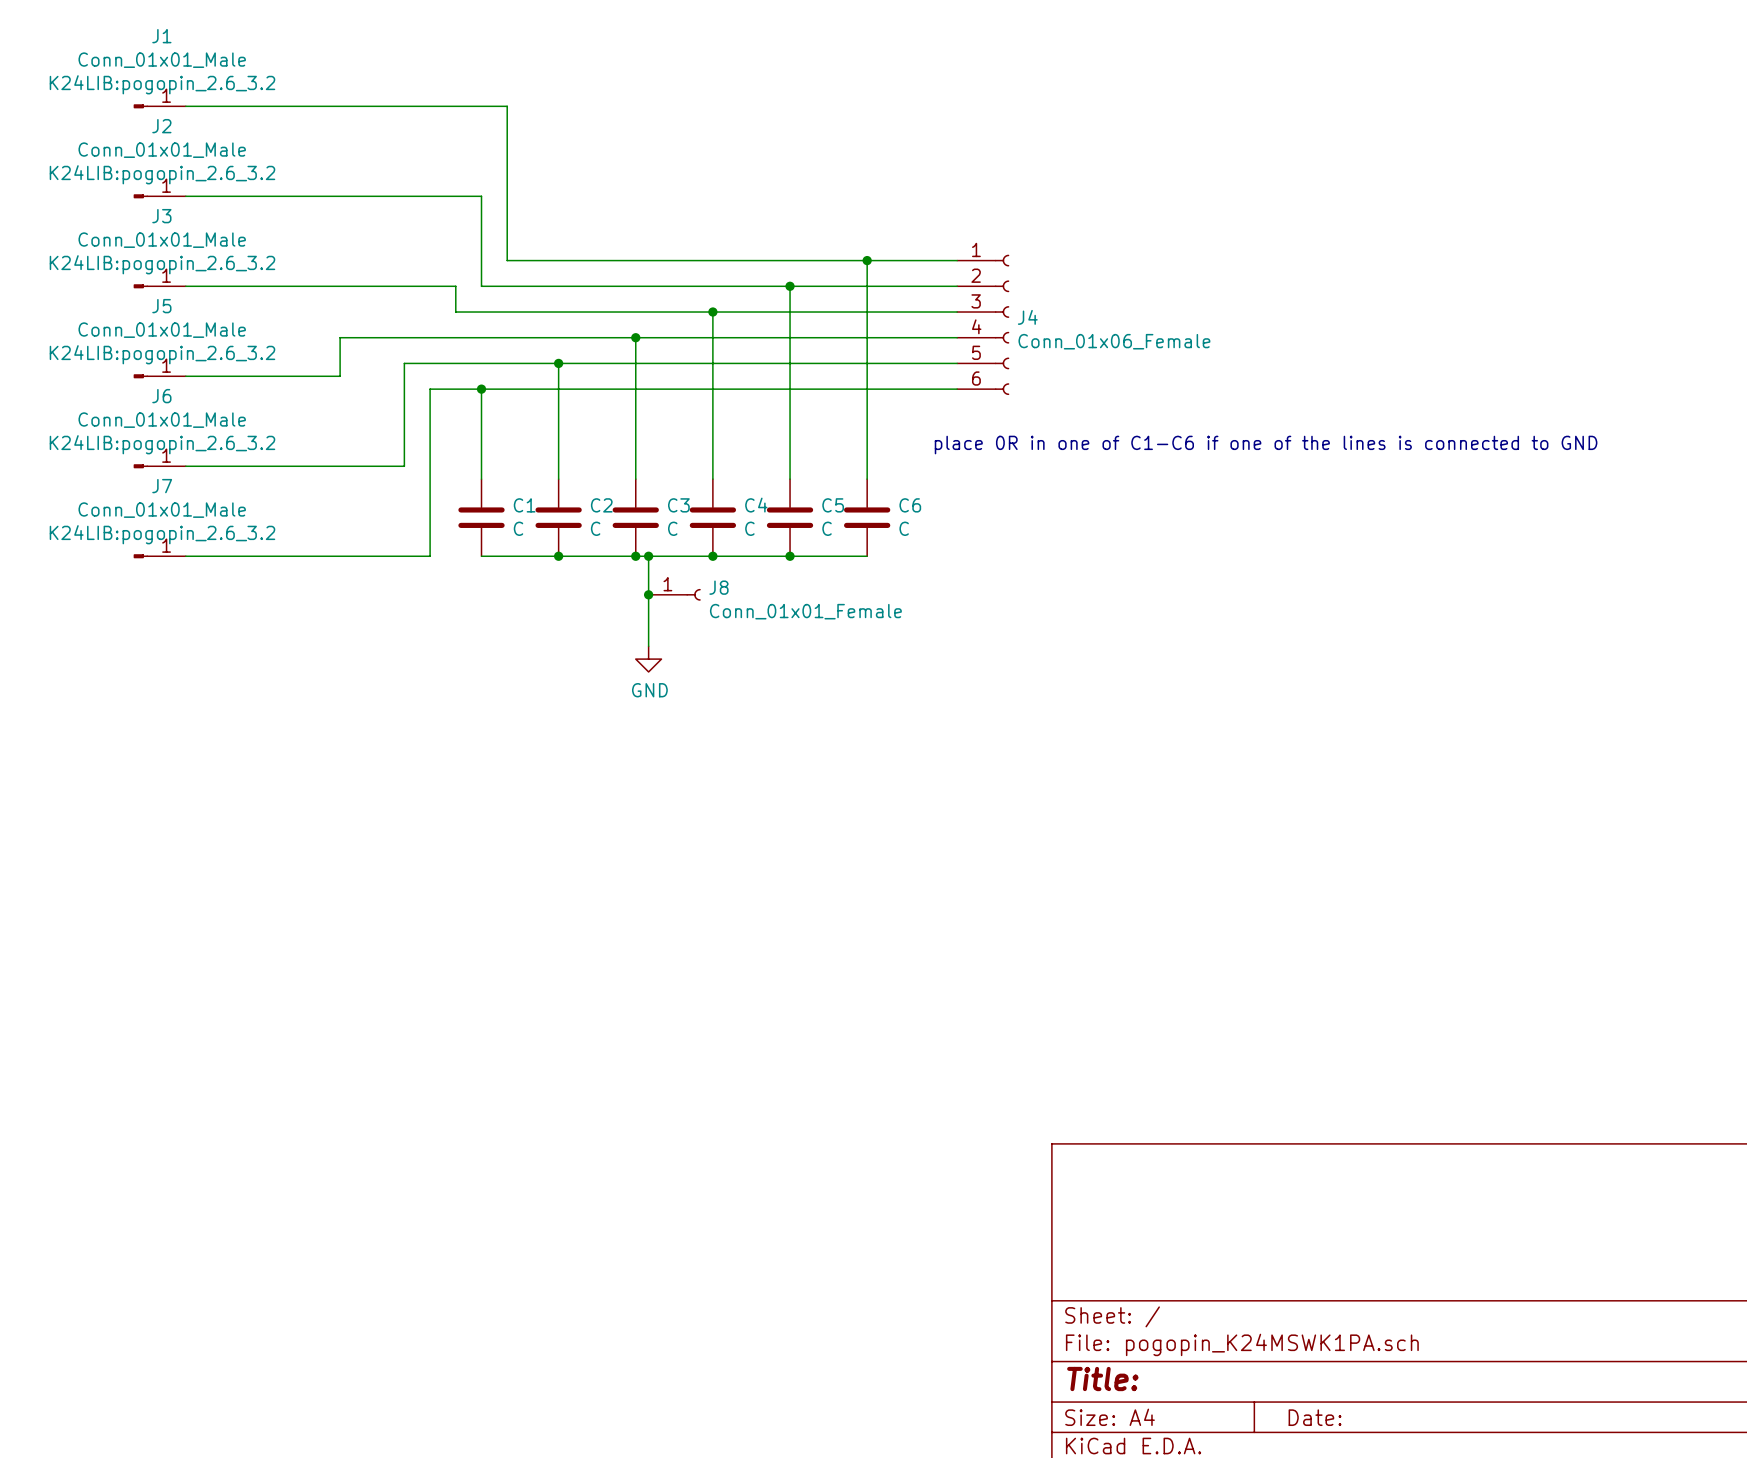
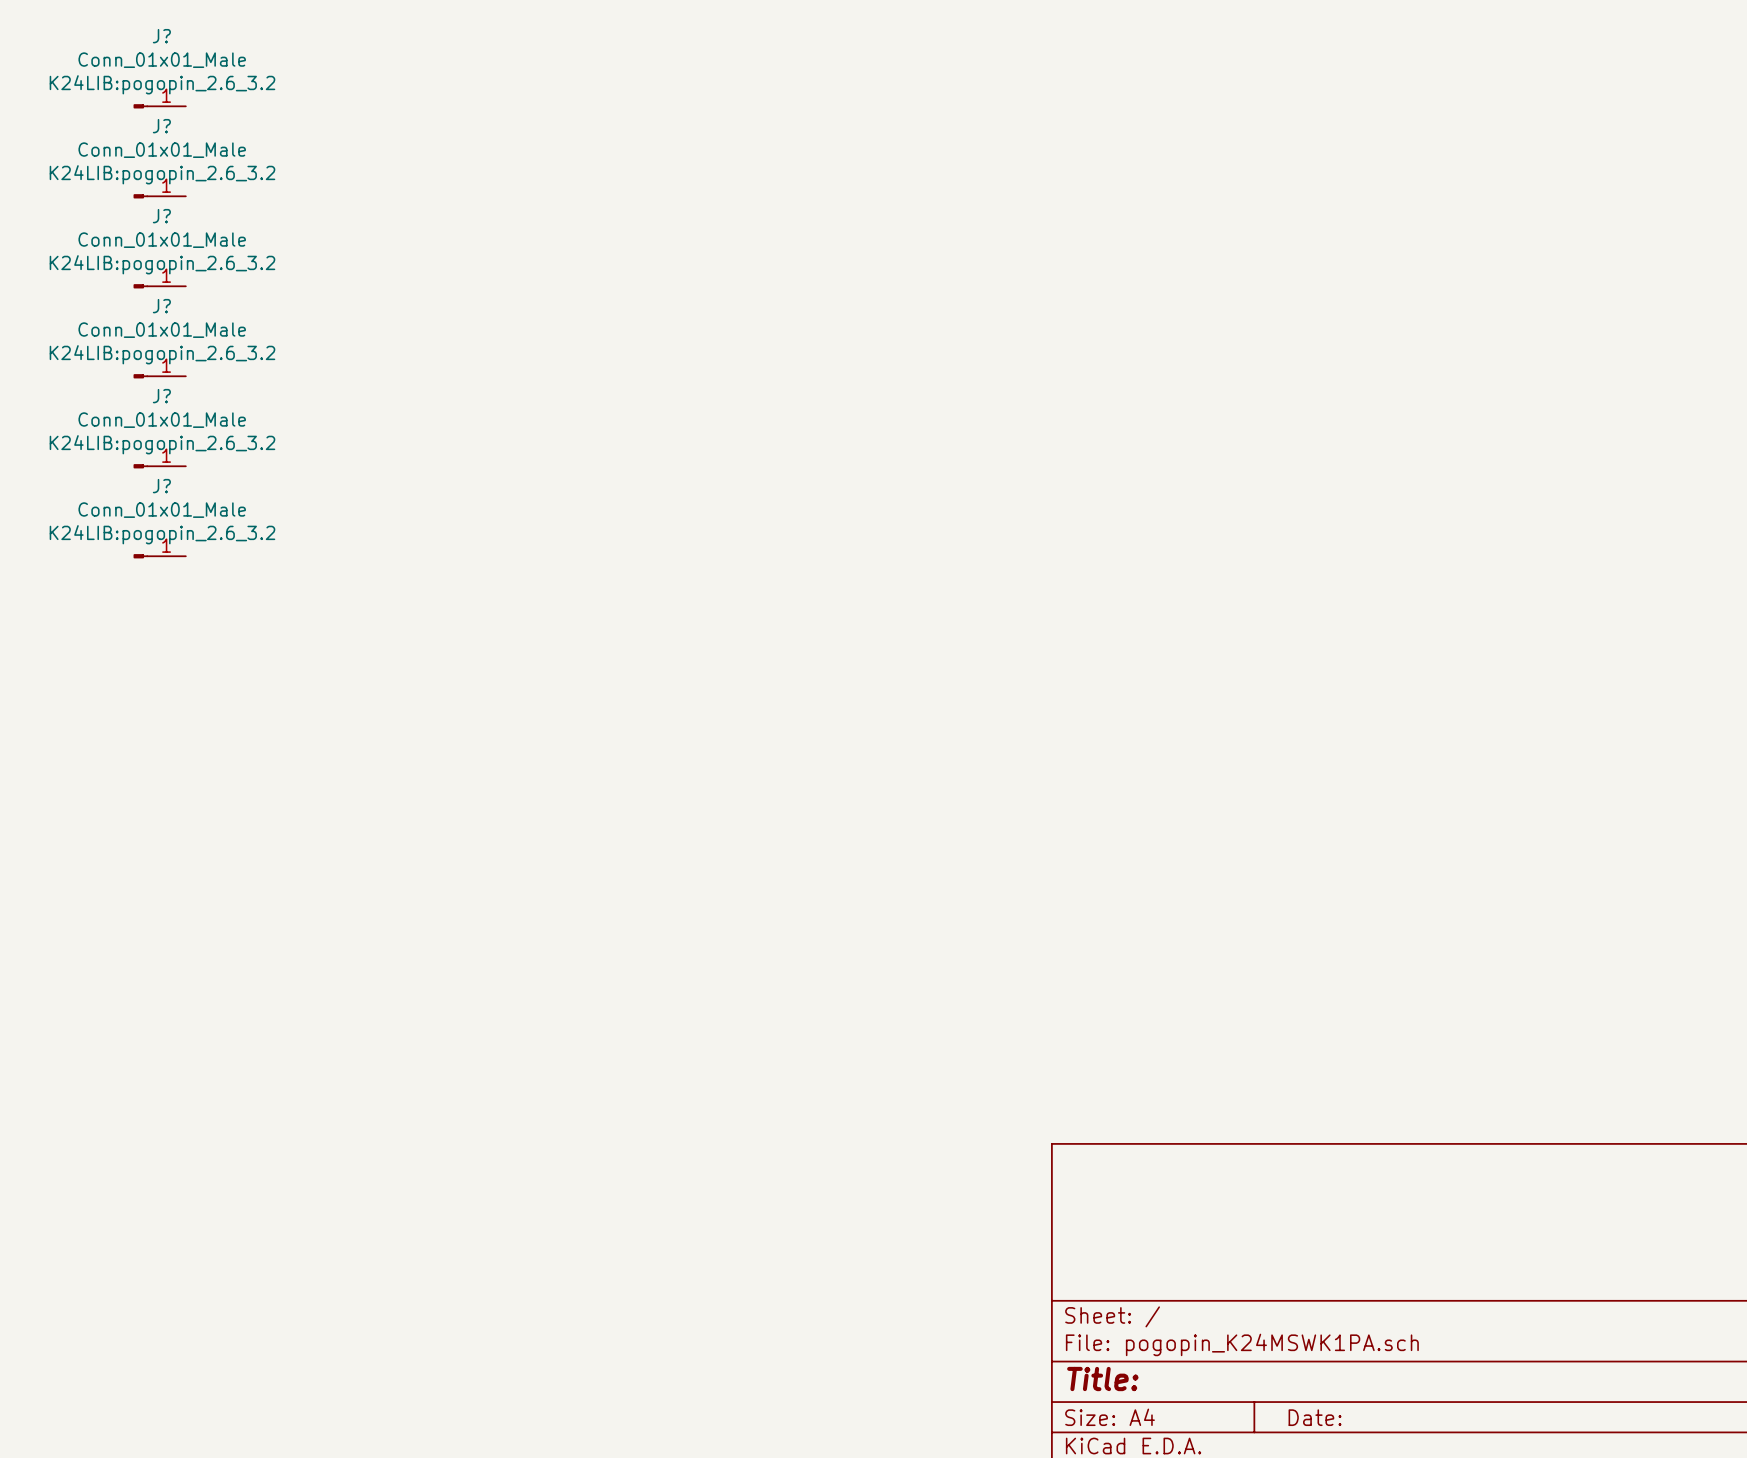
J1 name: J1 (161, 36) -> J? (161, 36)
wire: (185, 106) (507, 106) (507, 260) (957, 260) -> none
J2 name: J2 (161, 126) -> J? (161, 126)
wire: (185, 196) (481, 196) (481, 286) (957, 286) -> none
J3 name: J3 (161, 216) -> J? (161, 216)
wire: (867, 260) (867, 479) -> none
junction: (867, 260) -> none
wire: (185, 286) (455, 286) (455, 312) (957, 312) -> none
wire: (790, 286) (790, 479) -> none
junction: (790, 286) -> none
J5 name: J5 (161, 306) -> J? (161, 306)
wire: (712, 312) (712, 479) -> none
junction: (712, 312) -> none
J4: Conn_01x06_Female (983, 324) -> none
wire: (635, 337) (635, 479) -> none
junction: (635, 337) -> none
wire: (957, 337) (340, 337) (340, 376) (185, 376) -> none
wire: (558, 363) (558, 479) -> none
junction: (558, 363) -> none
wire: (957, 363) (404, 363) (404, 466) (185, 466) -> none
wire: (481, 389) (481, 479) -> none
junction: (481, 389) -> none
wire: (957, 389) (430, 389) (430, 556) (185, 556) -> none
J6 name: J6 (161, 396) -> J? (161, 396)
text: place 0R in one of C1-C6 if one of the lines is connected to GND (1266, 445) -> none
J7 name: J7 (162, 486) -> J? (161, 486)
C1: C (481, 517) -> none
C2: C (558, 517) -> none
C3: C (635, 517) -> none
C4: C (712, 517) -> none
C5: C (790, 517) -> none
C6: C (867, 517) -> none
wire: (481, 556) (867, 556) -> none
junction: (558, 556) -> none
junction: (635, 556) -> none
wire: (648, 556) (648, 646) -> none
junction: (648, 556) -> none
junction: (712, 556) -> none
junction: (790, 556) -> none
junction: (648, 594) -> none
J8: Conn_01x01_Female (674, 594) -> none
power symbol: GND (648, 659) -> none

